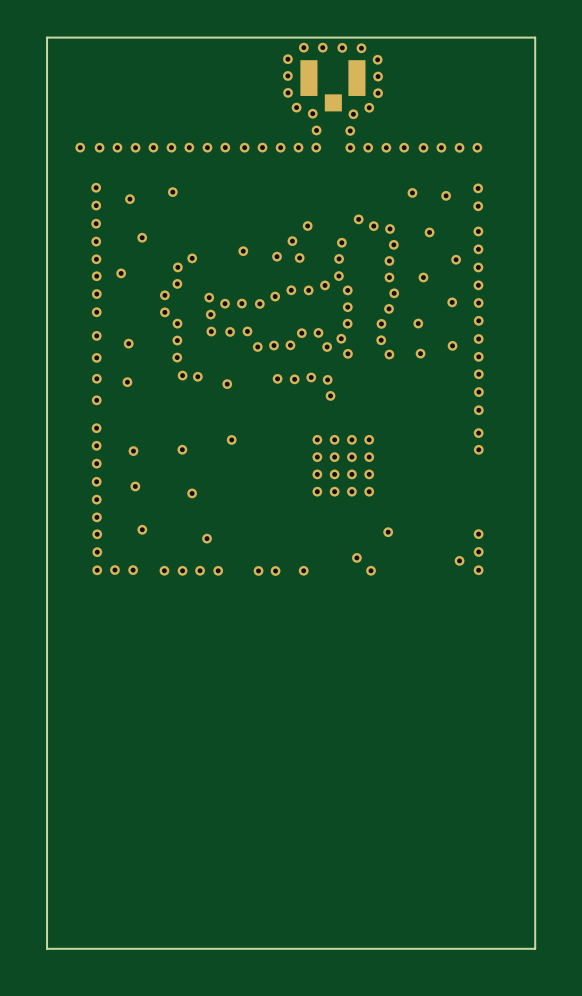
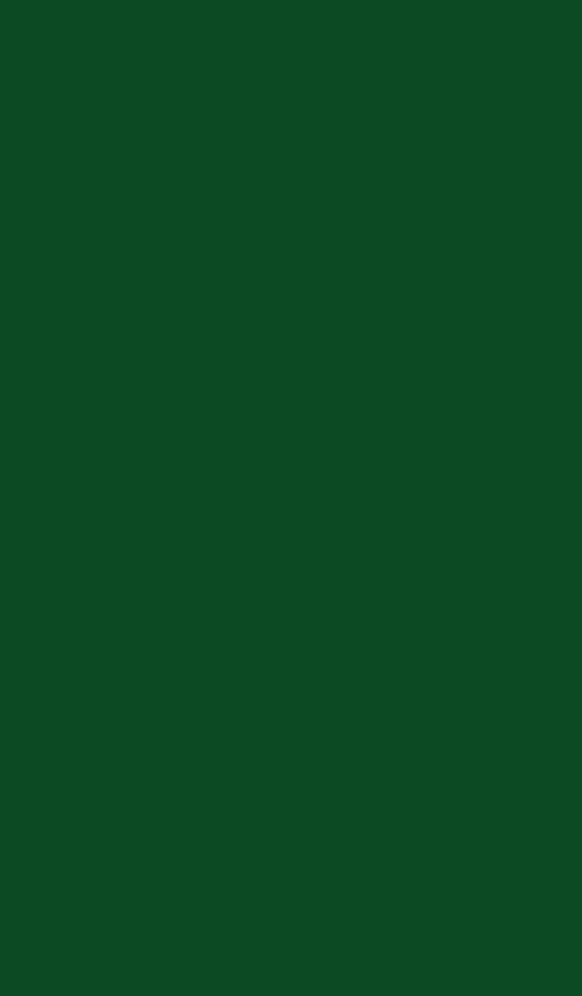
board edge: (535, 37) (47, 37) (47, 948) (535, 948) (535, 37) -> none
part: (303, 47) -> none
part: (322, 47) -> none
part: (342, 47) -> none
part: (361, 48) -> none
part: (287, 59) -> none
part: (377, 59) -> none
part: (287, 75) -> none
part: (378, 76) -> none
part: (332, 85) -> none
part: (288, 92) -> none
part: (378, 93) -> none
part: (296, 107) -> none
part: (369, 107) -> none
part: (312, 113) -> none
part: (353, 114) -> none
part: (316, 130) -> none
part: (350, 130) -> none
part: (80, 147) -> none
part: (99, 147) -> none
part: (117, 147) -> none
part: (135, 147) -> none
part: (153, 147) -> none
part: (171, 147) -> none
part: (189, 147) -> none
part: (207, 147) -> none
part: (225, 147) -> none
part: (244, 147) -> none
part: (262, 147) -> none
part: (280, 147) -> none
part: (298, 147) -> none
part: (316, 147) -> none
part: (350, 147) -> none
part: (368, 147) -> none
part: (386, 147) -> none
part: (404, 147) -> none
part: (423, 147) -> none
part: (441, 147) -> none
part: (459, 147) -> none
part: (477, 147) -> none
part: (96, 187) -> none
part: (478, 188) -> none
part: (172, 192) -> none
part: (412, 192) -> none
part: (446, 195) -> none
part: (129, 199) -> none
part: (96, 205) -> none
part: (478, 206) -> none
part: (358, 219) -> none
part: (96, 223) -> none
part: (307, 226) -> none
part: (373, 226) -> none
part: (390, 228) -> none
part: (478, 231) -> none
part: (429, 232) -> none
part: (142, 237) -> none
part: (96, 241) -> none
part: (292, 241) -> none
part: (341, 242) -> none
part: (393, 244) -> none
part: (478, 249) -> none
part: (243, 251) -> none
part: (277, 256) -> none
part: (299, 257) -> none
part: (192, 258) -> none
part: (339, 258) -> none
part: (96, 259) -> none
part: (456, 259) -> none
part: (389, 260) -> none
part: (177, 267) -> none
part: (478, 267) -> none
part: (121, 273) -> none
part: (96, 276) -> none
part: (338, 276) -> none
part: (389, 277) -> none
part: (423, 277) -> none
part: (177, 283) -> none
part: (324, 285) -> none
part: (478, 285) -> none
part: (291, 290) -> none
part: (308, 290) -> none
part: (347, 290) -> none
part: (394, 293) -> none
part: (96, 294) -> none
part: (164, 295) -> none
part: (275, 296) -> none
part: (209, 297) -> none
part: (452, 302) -> none
part: (225, 303) -> none
part: (241, 303) -> none
part: (259, 303) -> none
part: (478, 303) -> none
part: (347, 307) -> none
part: (389, 308) -> none
part: (96, 312) -> none
part: (164, 312) -> none
part: (210, 314) -> none
part: (478, 320) -> none
part: (177, 323) -> none
part: (347, 323) -> none
part: (381, 323) -> none
part: (418, 323) -> none
part: (211, 331) -> none
part: (230, 331) -> none
part: (247, 331) -> none
part: (318, 332) -> none
part: (301, 333) -> none
part: (96, 335) -> none
part: (341, 338) -> none
part: (478, 338) -> none
part: (177, 340) -> none
part: (381, 340) -> none
part: (128, 343) -> none
part: (273, 345) -> none
part: (290, 345) -> none
part: (452, 345) -> none
part: (257, 346) -> none
part: (327, 346) -> none
part: (347, 353) -> none
part: (420, 353) -> none
part: (389, 354) -> none
part: (478, 356) -> none
part: (96, 357) -> none
part: (177, 357) -> none
part: (478, 374) -> none
part: (182, 375) -> none
part: (197, 376) -> none
part: (311, 377) -> none
part: (96, 378) -> none
part: (277, 378) -> none
part: (294, 379) -> none
part: (327, 379) -> none
part: (127, 382) -> none
part: (227, 384) -> none
part: (478, 392) -> none
part: (330, 395) -> none
part: (96, 400) -> none
part: (478, 410) -> none
part: (96, 428) -> none
part: (478, 433) -> none
part: (231, 439) -> none
part: (317, 439) -> none
part: (334, 439) -> none
part: (351, 439) -> none
part: (369, 439) -> none
part: (96, 445) -> none
part: (182, 449) -> none
part: (478, 449) -> none
part: (133, 451) -> none
part: (317, 457) -> none
part: (334, 457) -> none
part: (351, 457) -> none
part: (369, 457) -> none
part: (96, 463) -> none
part: (317, 474) -> none
part: (334, 474) -> none
part: (351, 474) -> none
part: (369, 474) -> none
part: (96, 481) -> none
part: (135, 486) -> none
part: (317, 491) -> none
part: (334, 491) -> none
part: (351, 491) -> none
part: (369, 491) -> none
part: (192, 493) -> none
part: (96, 499) -> none
part: (96, 517) -> none
part: (142, 529) -> none
part: (388, 532) -> none
part: (97, 534) -> none
part: (478, 534) -> none
part: (207, 538) -> none
part: (478, 551) -> none
part: (97, 552) -> none
part: (356, 557) -> none
part: (459, 560) -> none
part: (97, 570) -> none
part: (114, 570) -> none
part: (133, 570) -> none
part: (164, 570) -> none
part: (182, 570) -> none
part: (200, 570) -> none
part: (218, 570) -> none
part: (258, 570) -> none
part: (275, 570) -> none
part: (303, 570) -> none
part: (371, 570) -> none
part: (478, 570) -> none

